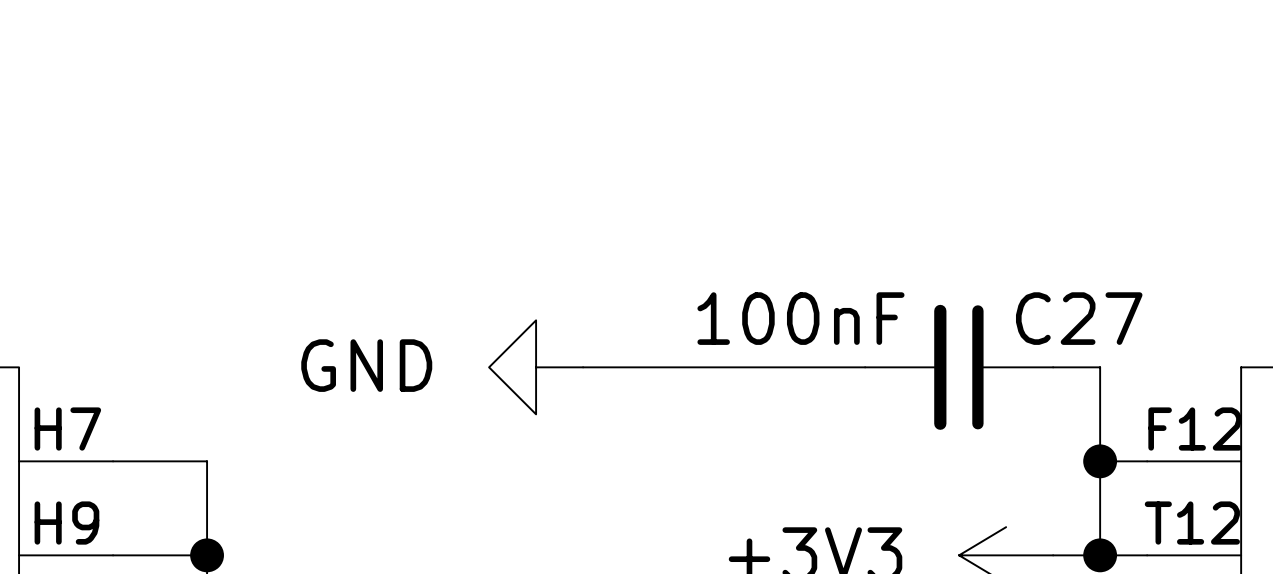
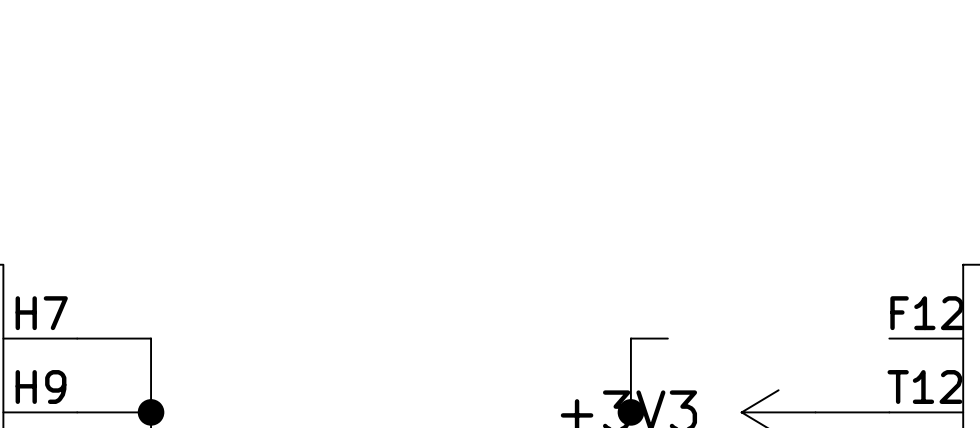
power symbol: GND (536, 367) -> none
wire: (583, 367) (865, 367) -> none
C27: 100nF (959, 367) -> none
wire: (1053, 367) (1100, 367) (1100, 555) -> none
wire: none -> (667, 338) (630, 338) (630, 412)
wire: (1100, 461) (1147, 461) -> none
junction: (1100, 461) -> none
junction: none -> (630, 412)
junction: (1100, 555) -> none

